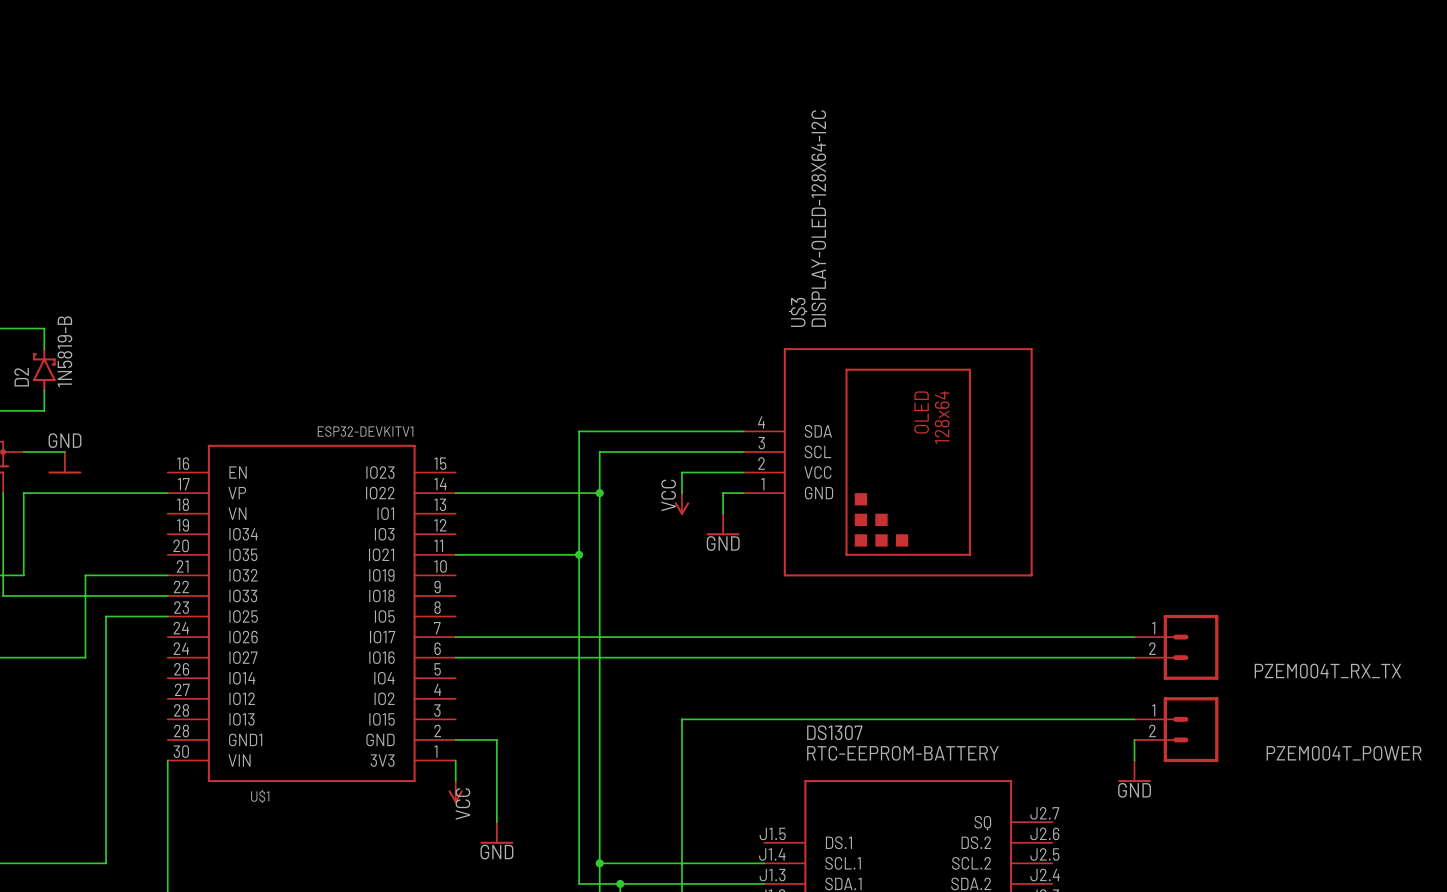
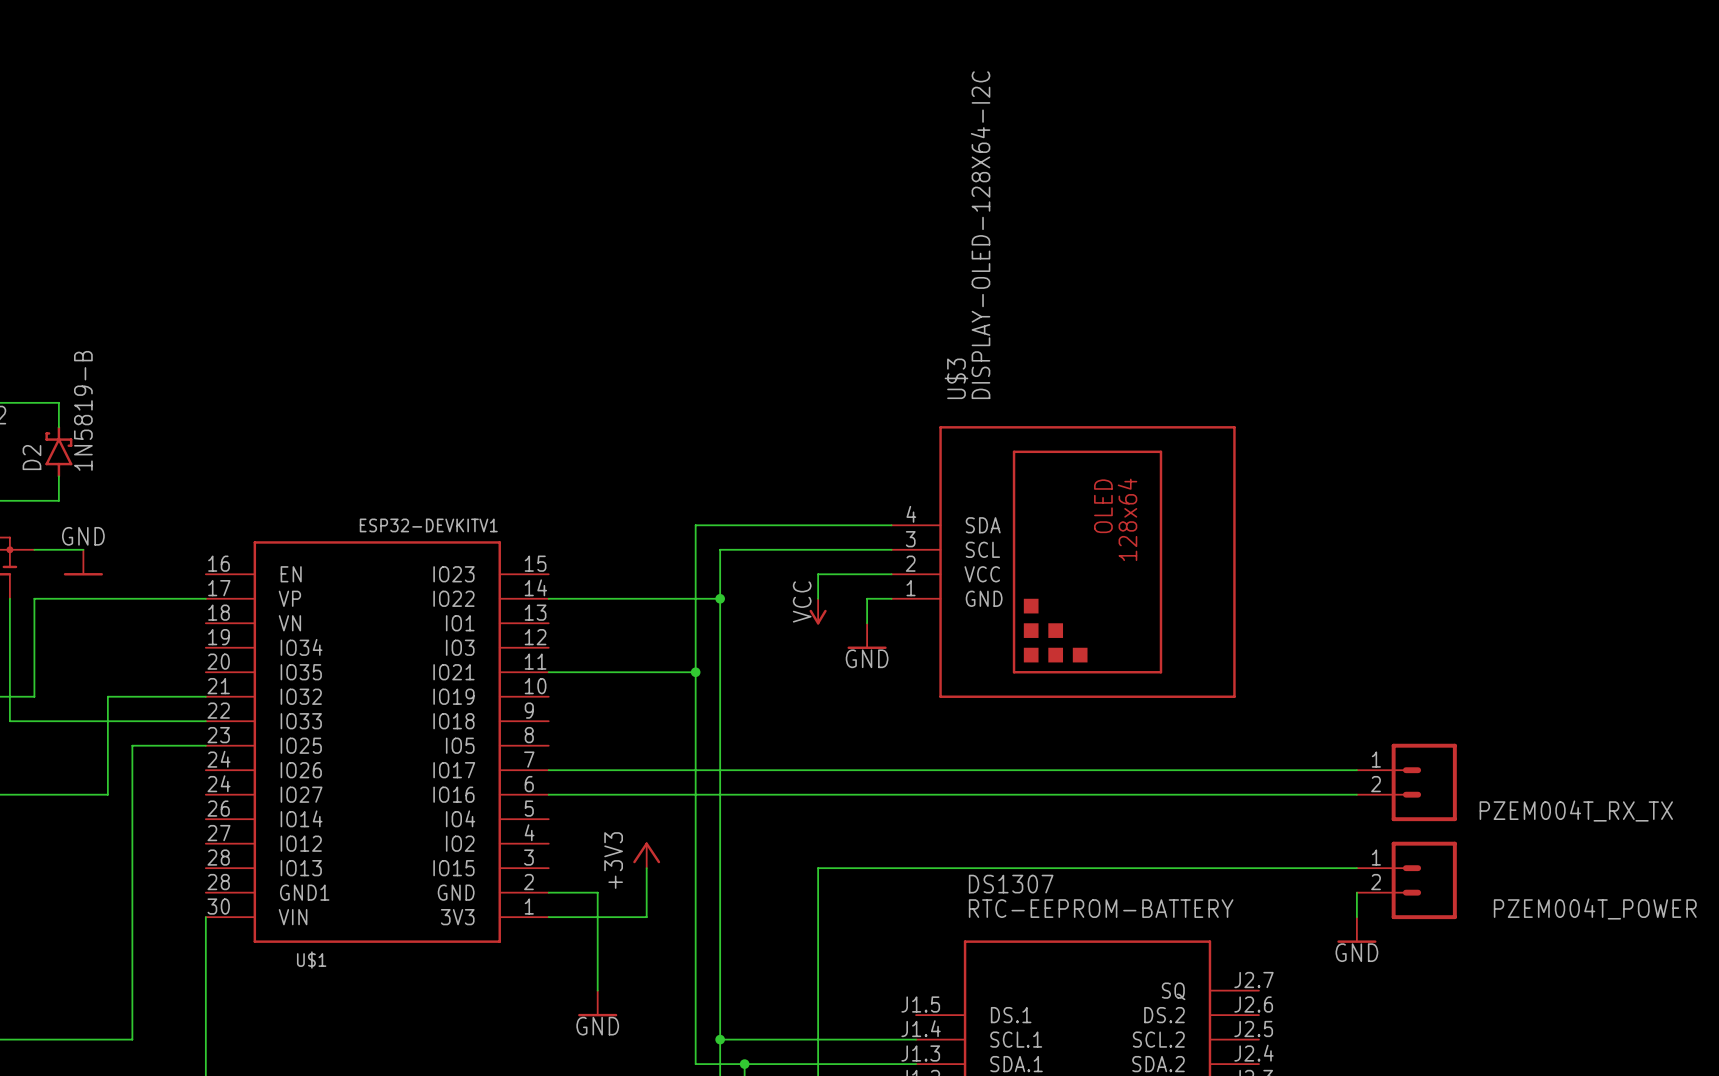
power symbol: none -> +3V3 (646, 855)
wire: (455, 760) (455, 781) -> (548, 917) (646, 917) (646, 868)
power symbol: VCC (455, 791) -> none

